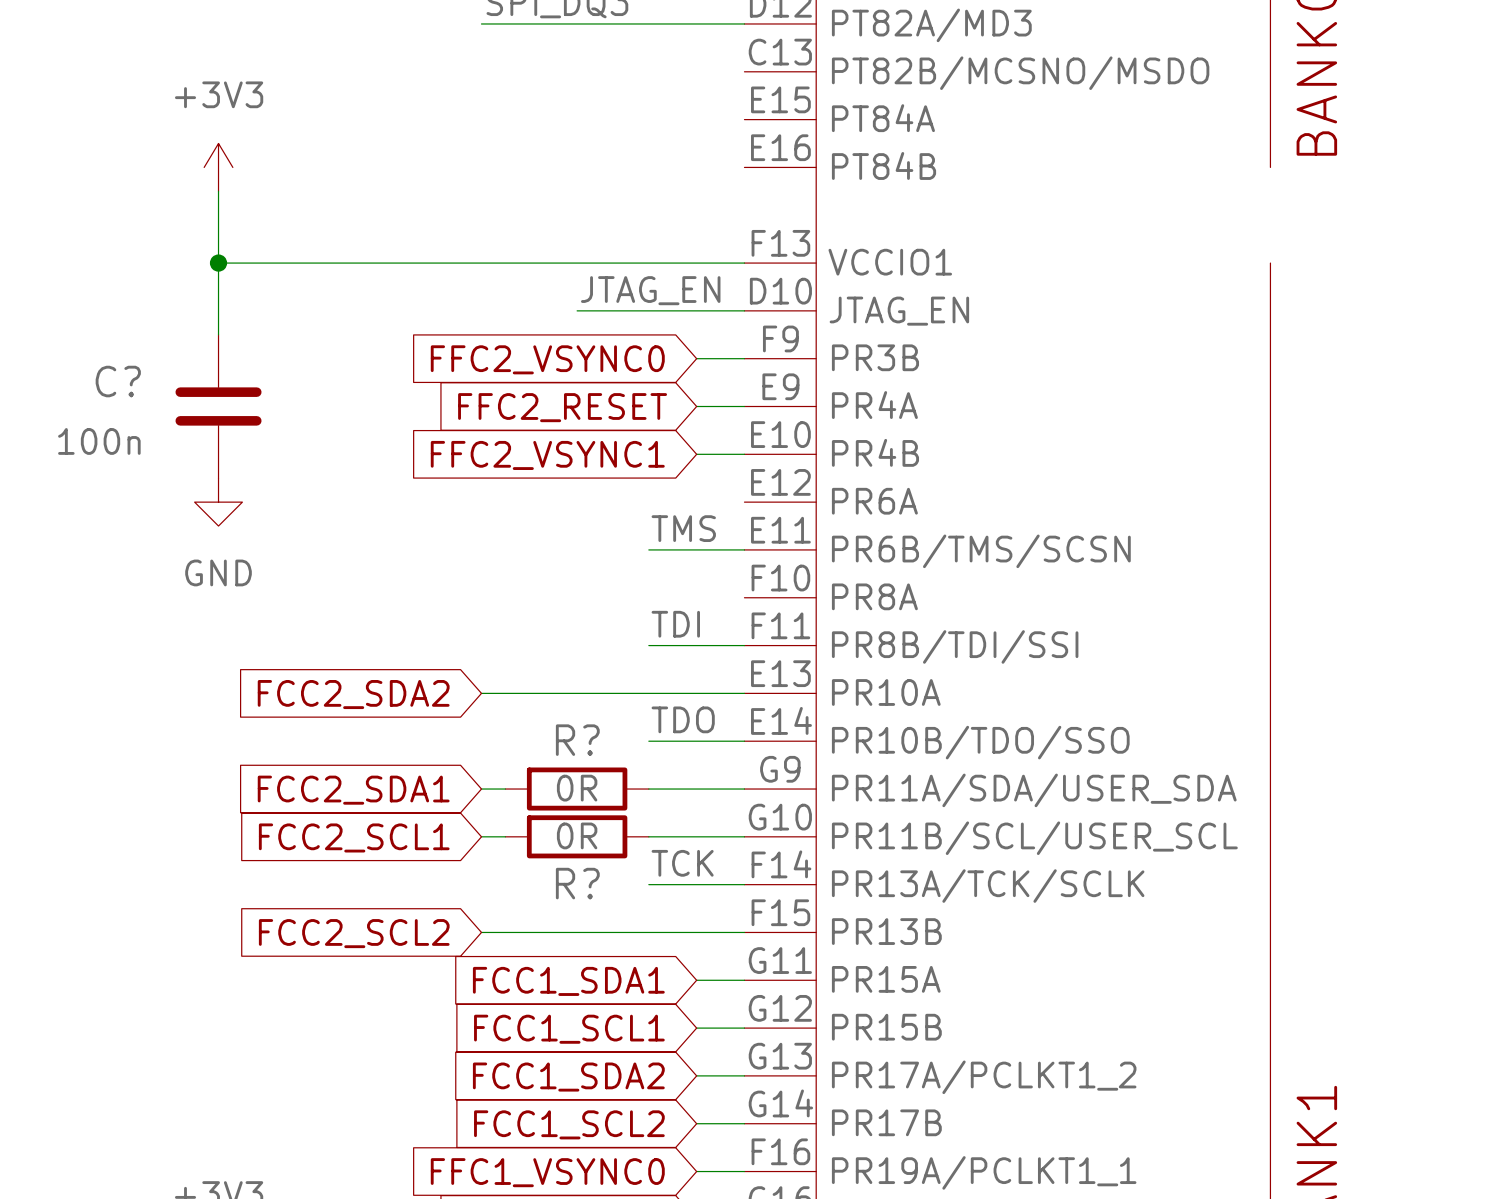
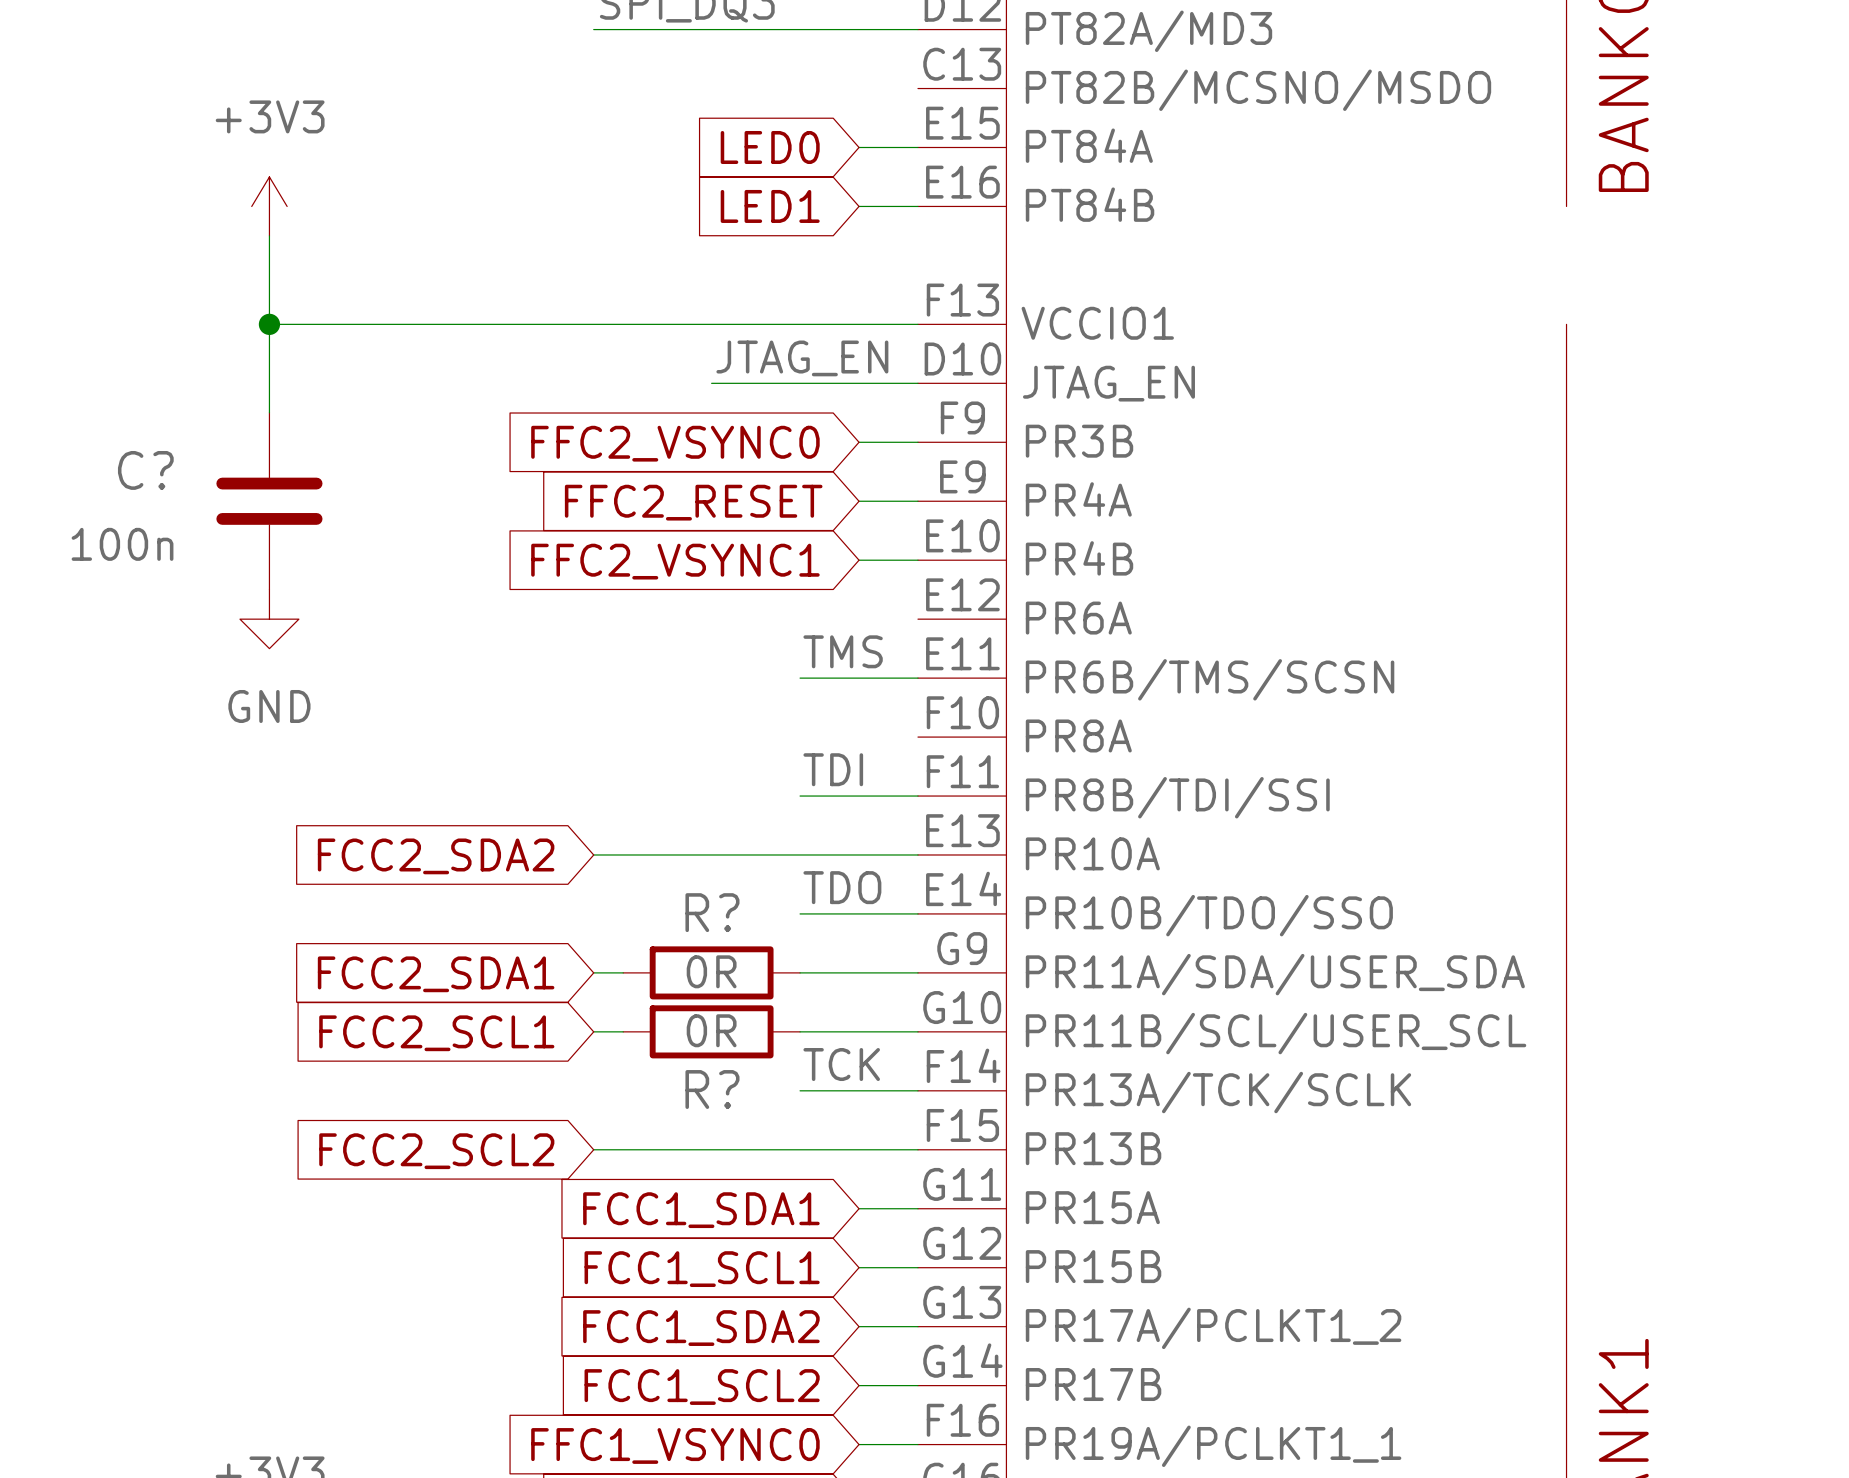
global label: none -> LED0 (770, 147)
wire: none -> (859, 147) (917, 147)
global label: none -> LED1 (770, 206)
wire: none -> (859, 206) (917, 206)

